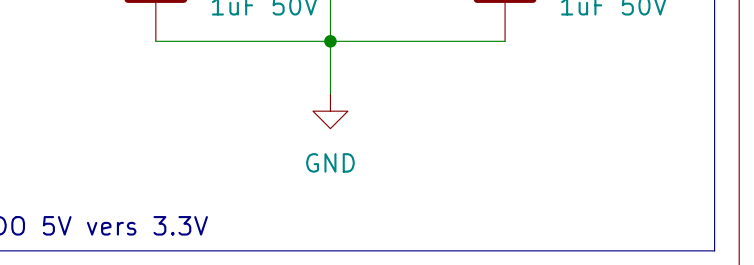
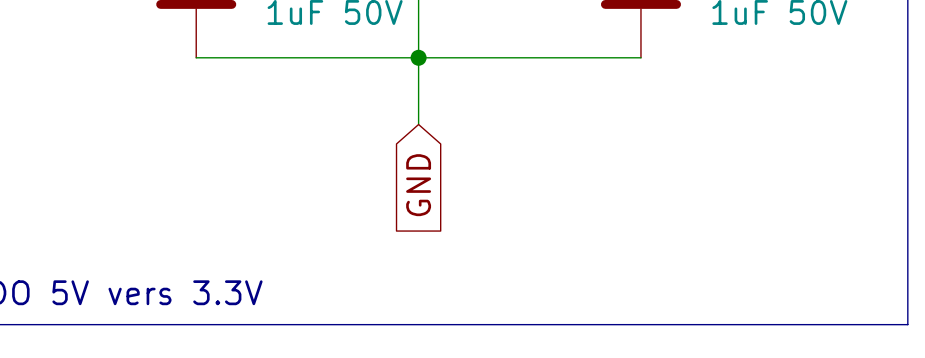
power symbol: GND (330, 111) -> none
global label: none -> GND (418, 185)

